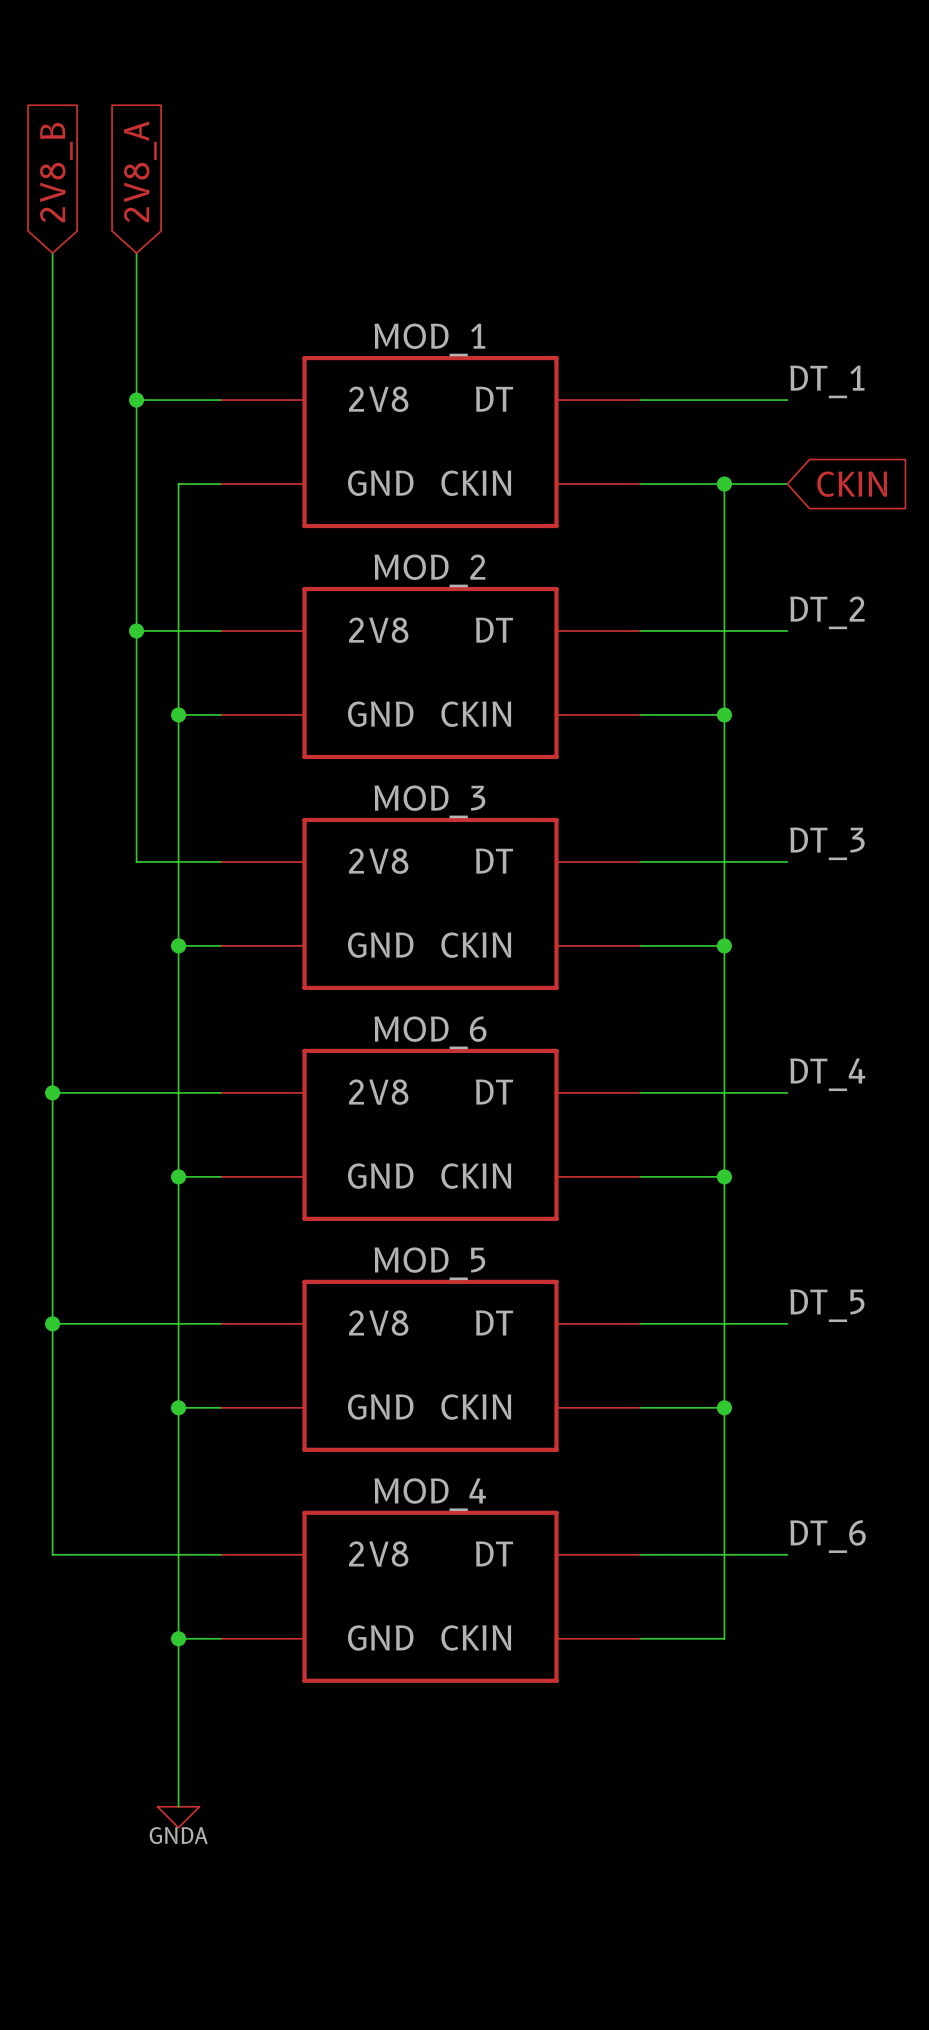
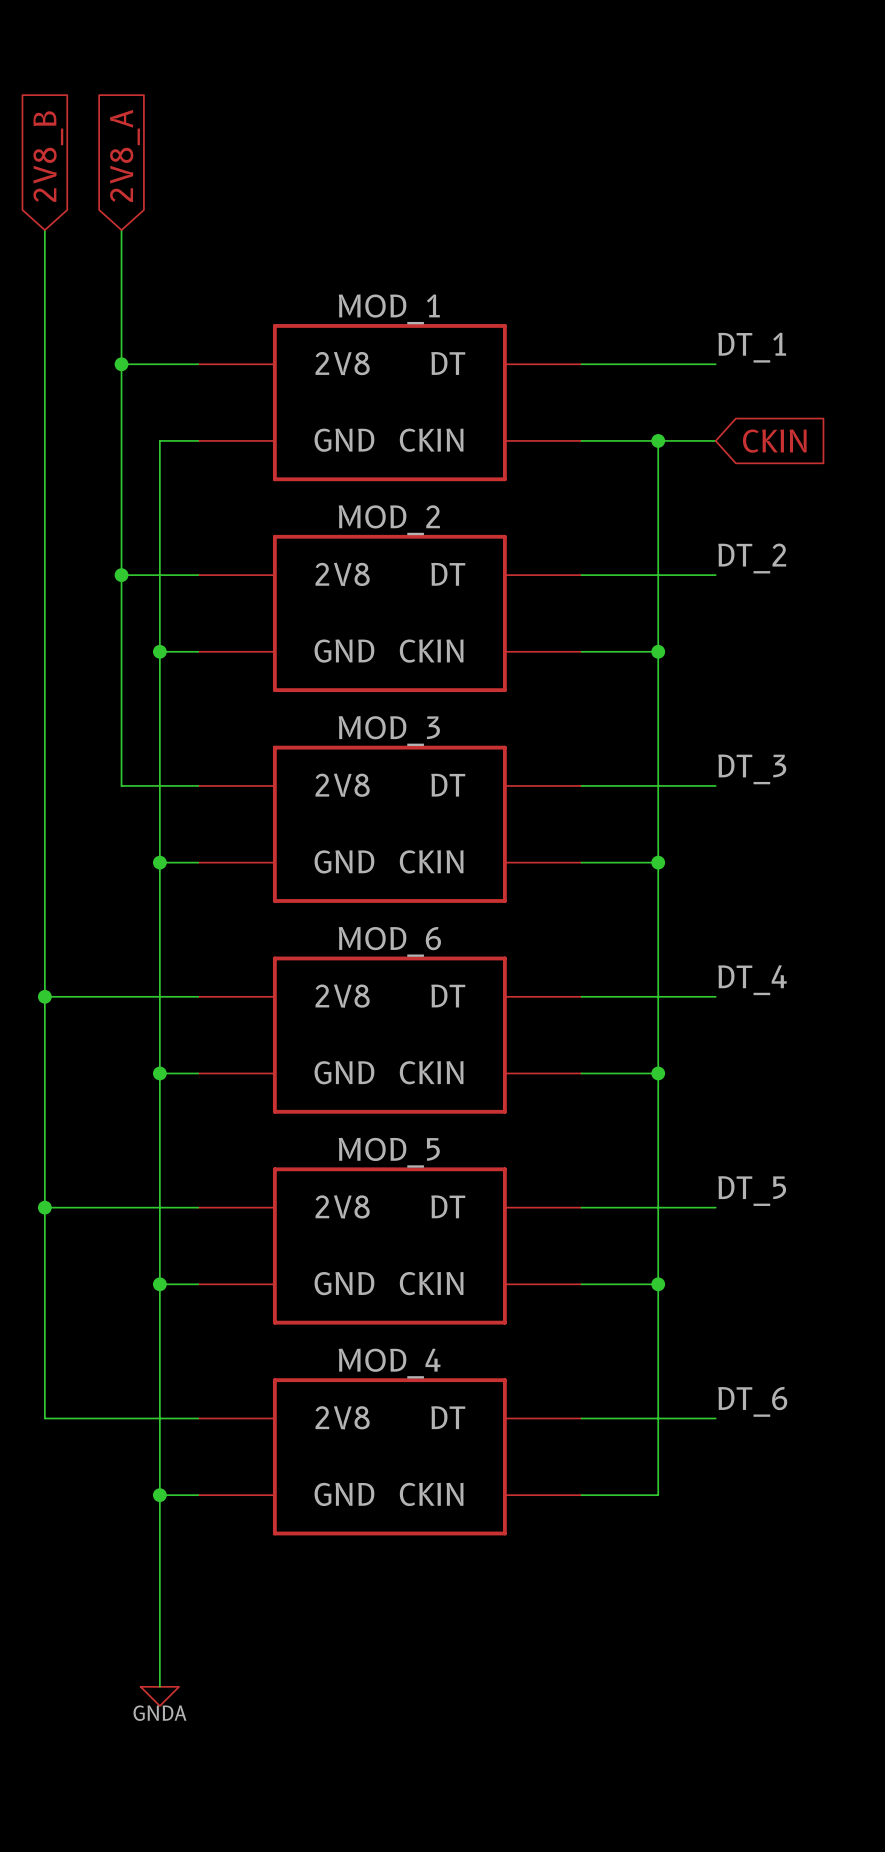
wire: none -> (159, 1648) (159, 1686)
power symbol position: GNDA (178, 1817) -> GNDA (159, 1696)

